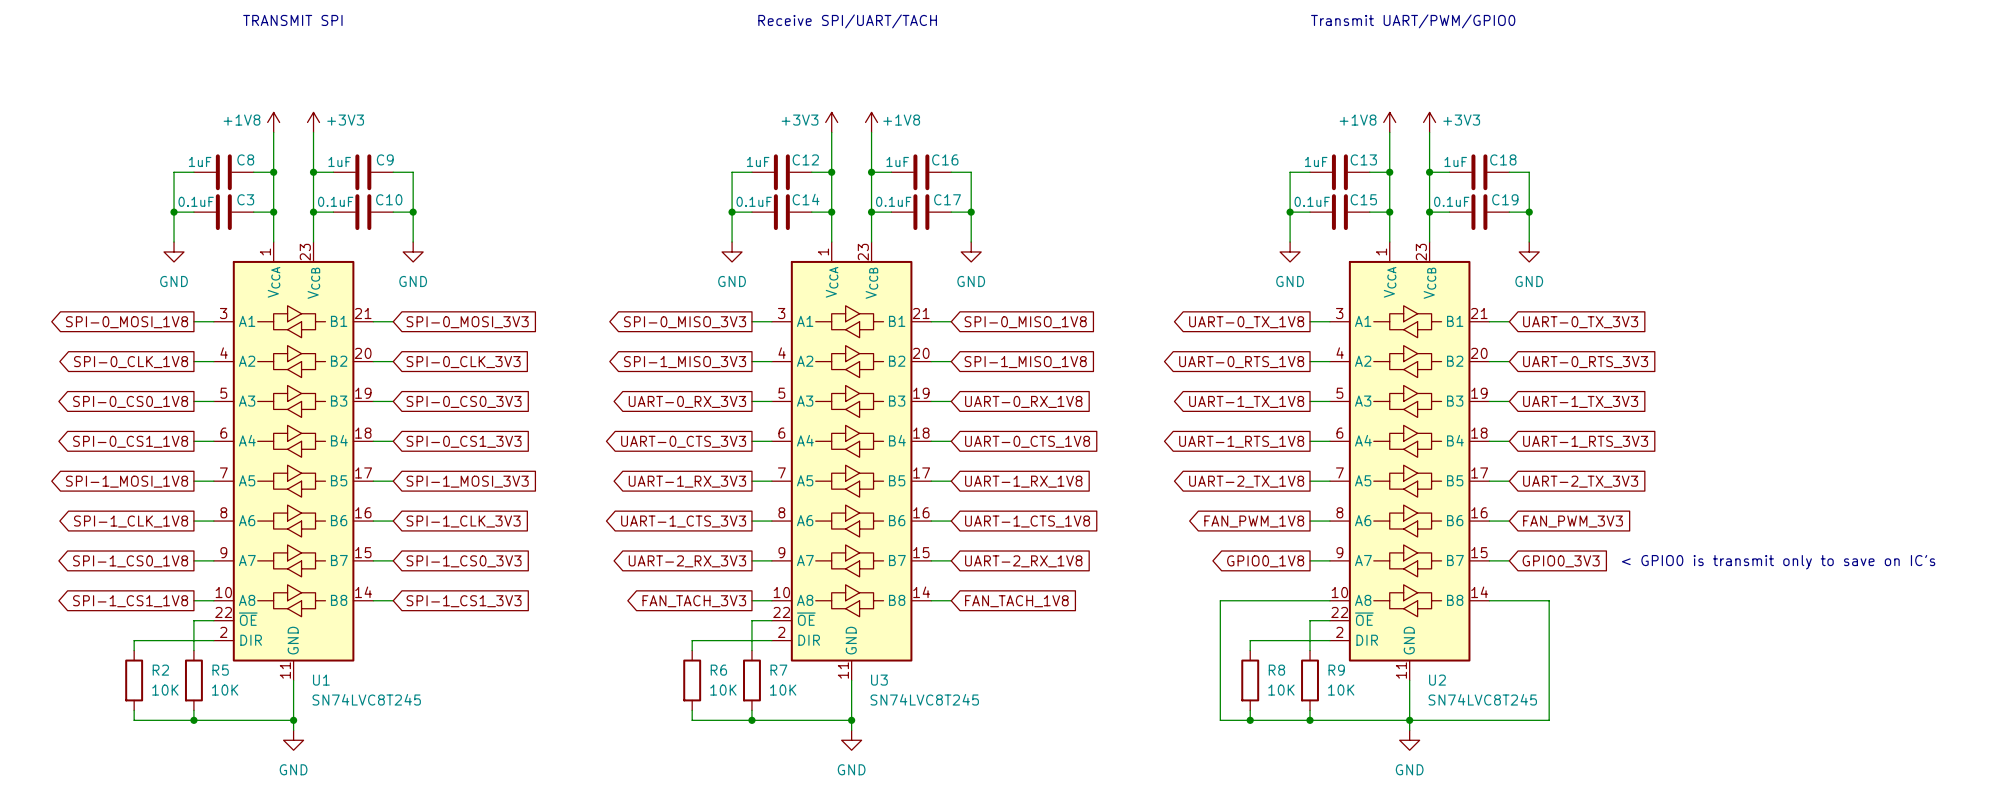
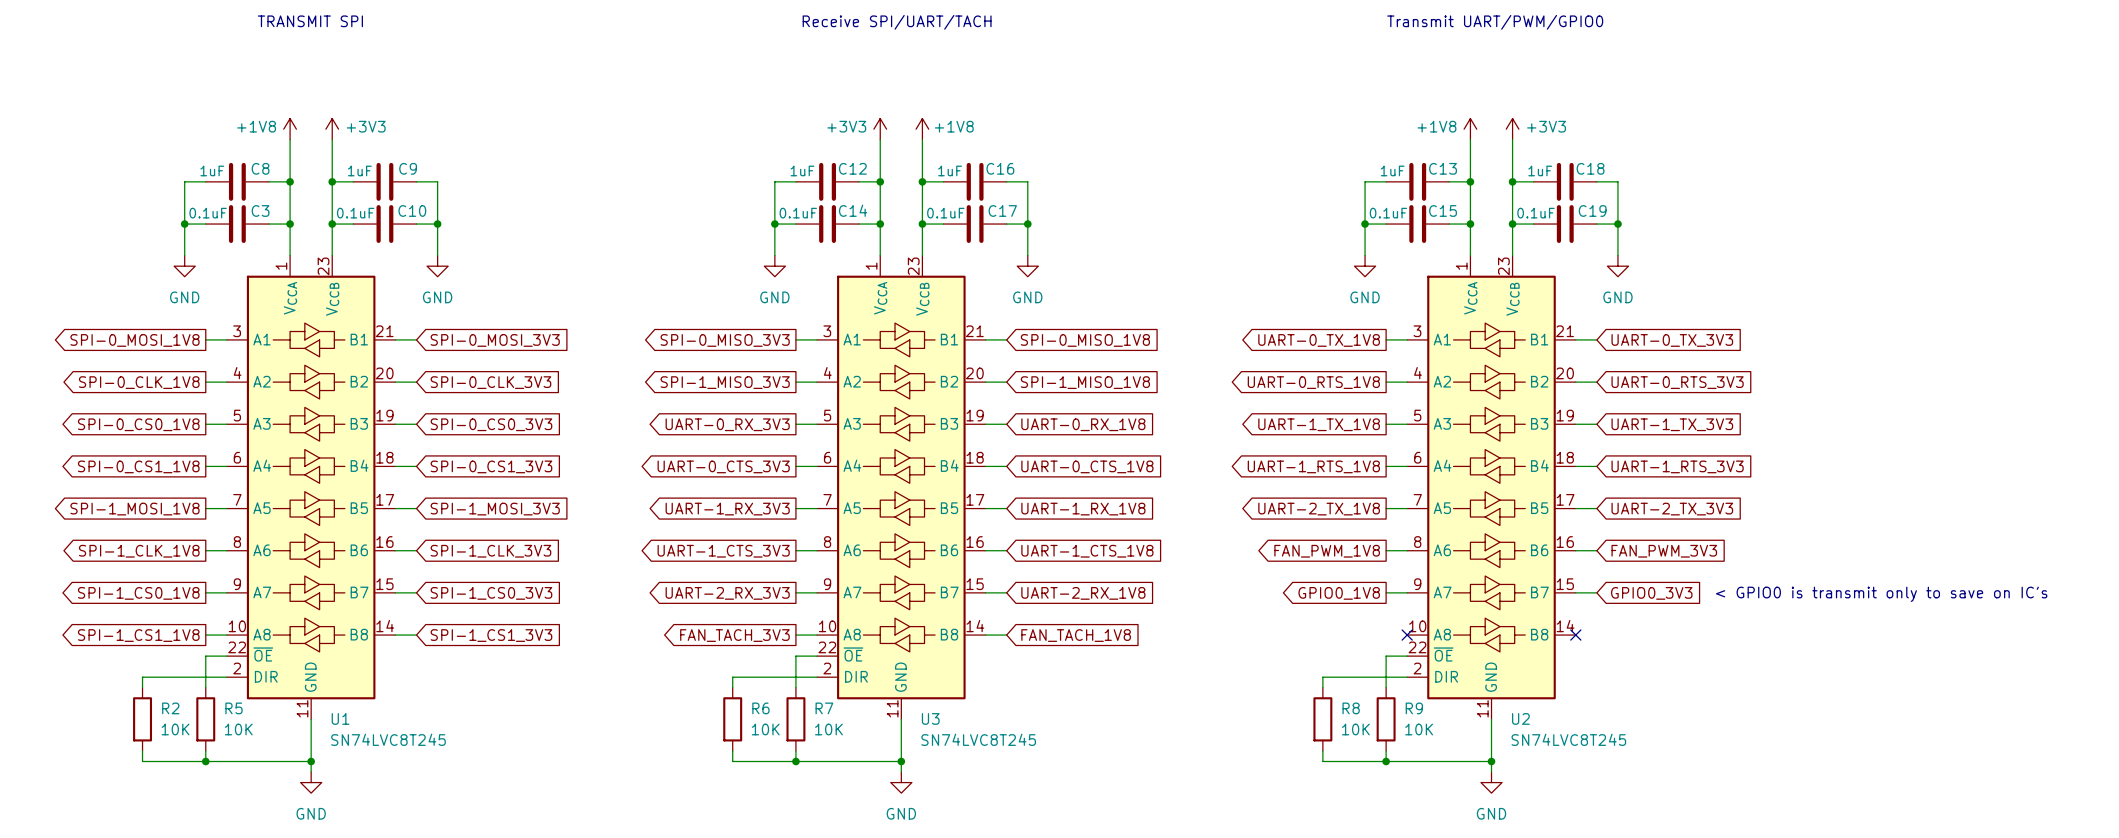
wire: (1329, 600) (1220, 600) (1220, 720) (1250, 720) -> none
no-connect mark: none -> (1407, 635)
wire: (1489, 600) (1549, 600) (1549, 720) (1409, 720) -> none
no-connect mark: none -> (1575, 635)
junction: (1250, 720) -> none

